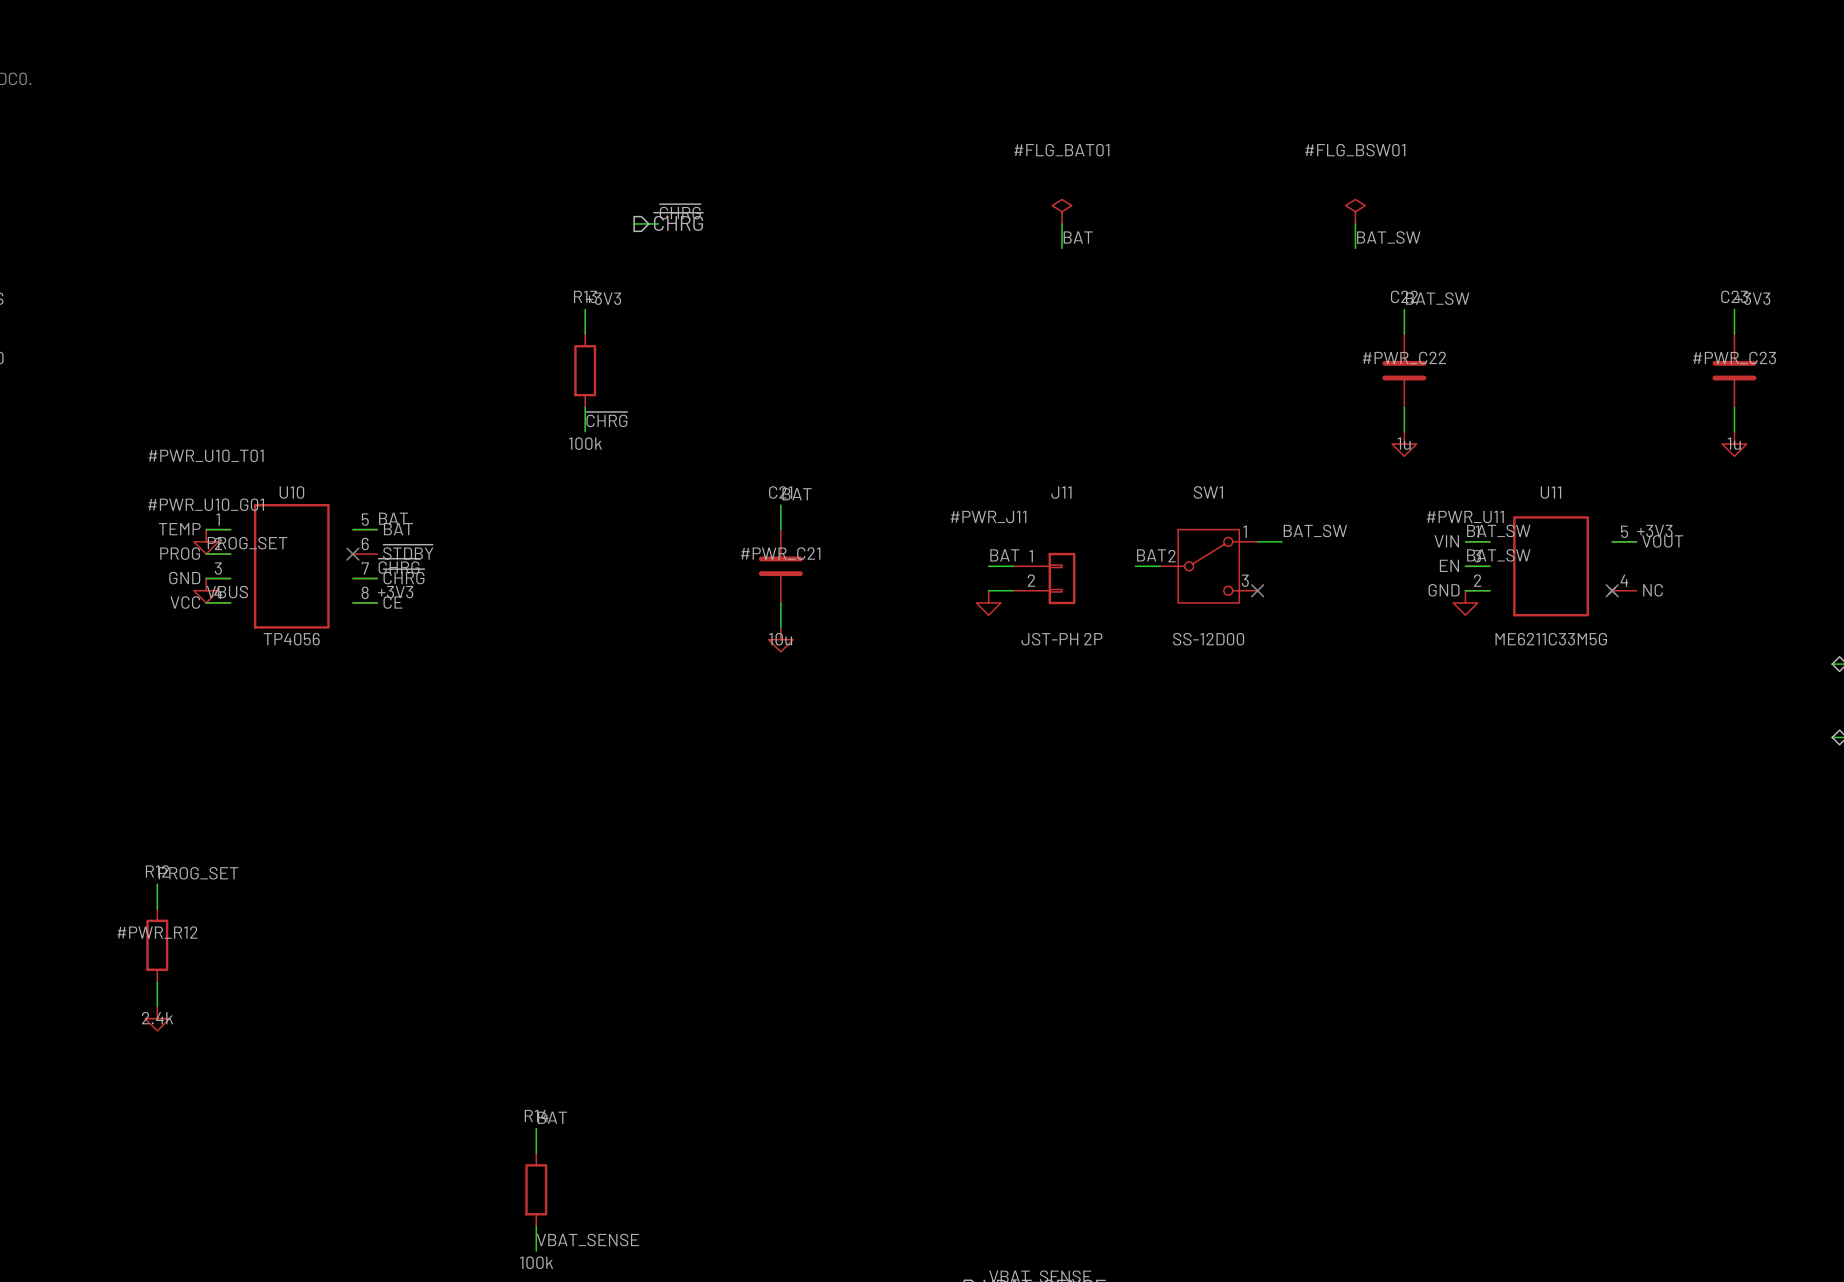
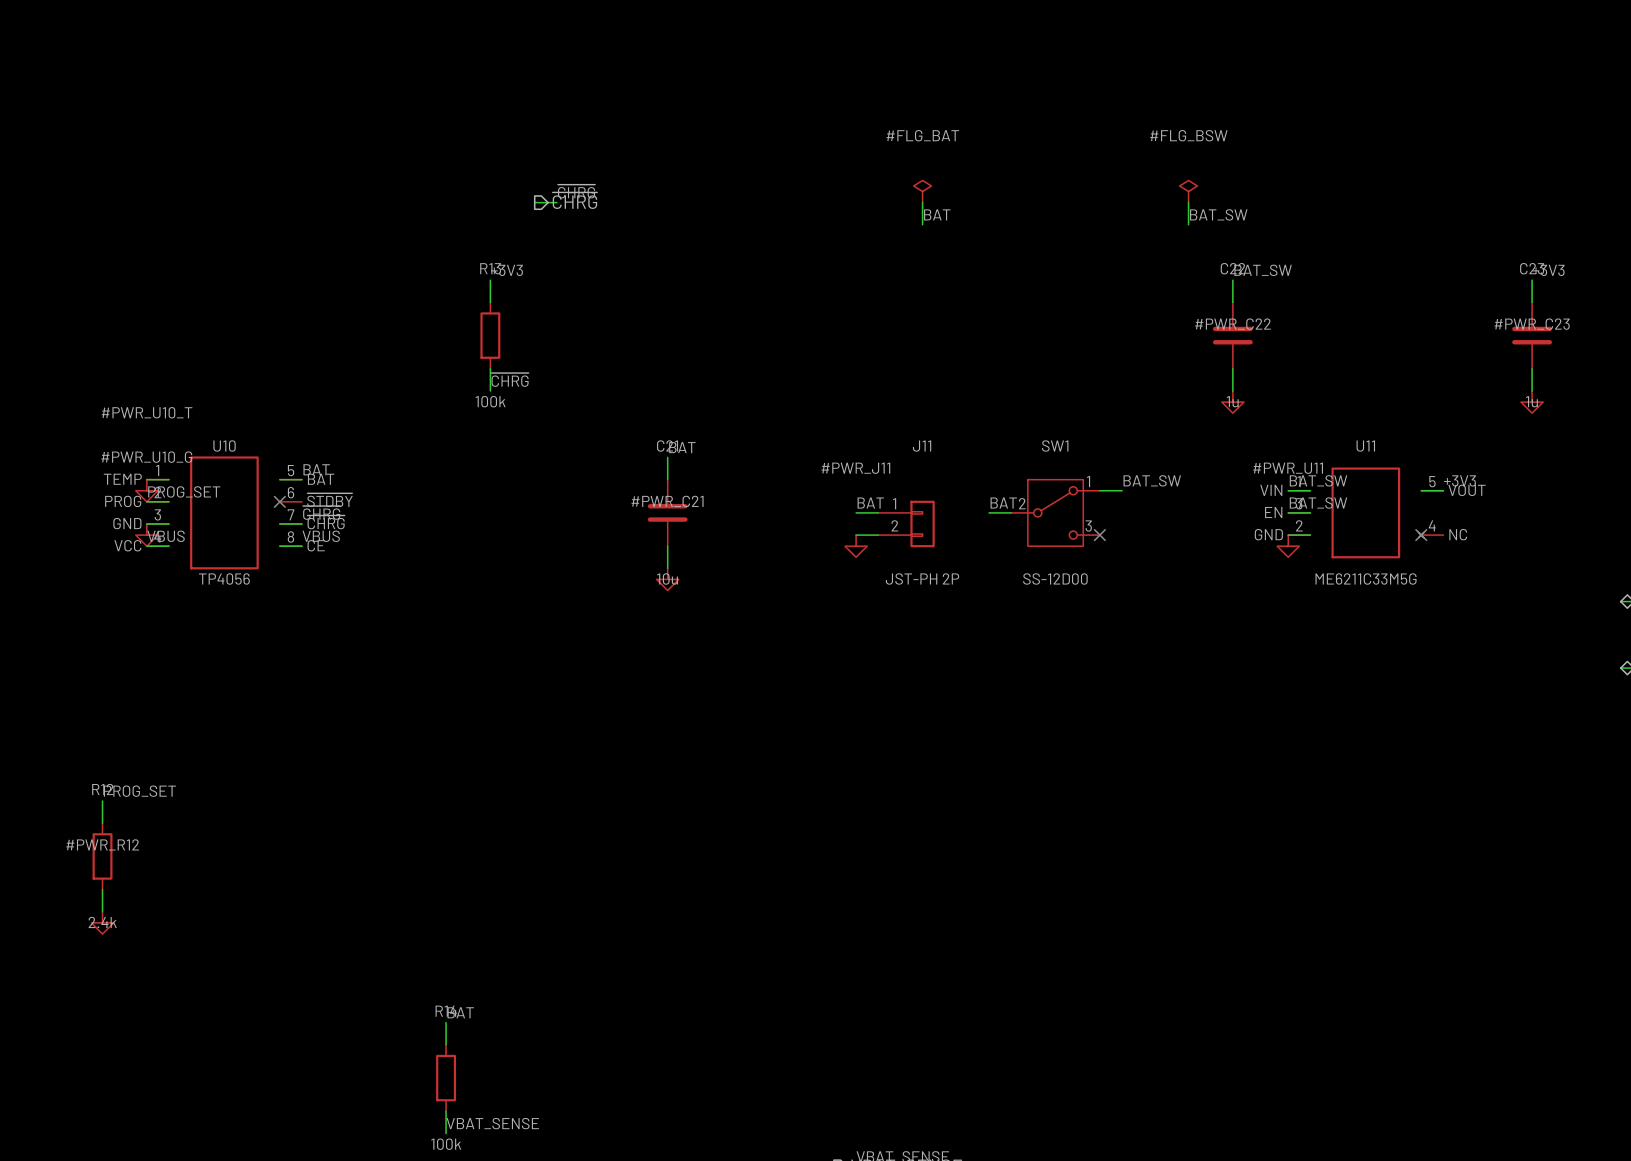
#FLG_BAT01 name: #FLG_BAT01 (1061, 150) -> #FLG_BAT (922, 135)
#FLG_BSW01 name: #FLG_BSW01 (1355, 150) -> #FLG_BSW (1188, 135)
#PWR_U10_T01 name: #PWR_U10_T01 (206, 455) -> #PWR_U10_T (147, 412)
#PWR_U10_G01 name: #PWR_U10_G01 (206, 504) -> #PWR_U10_G (146, 457)
label: +3V3 (395, 592) -> VBUS (321, 536)

